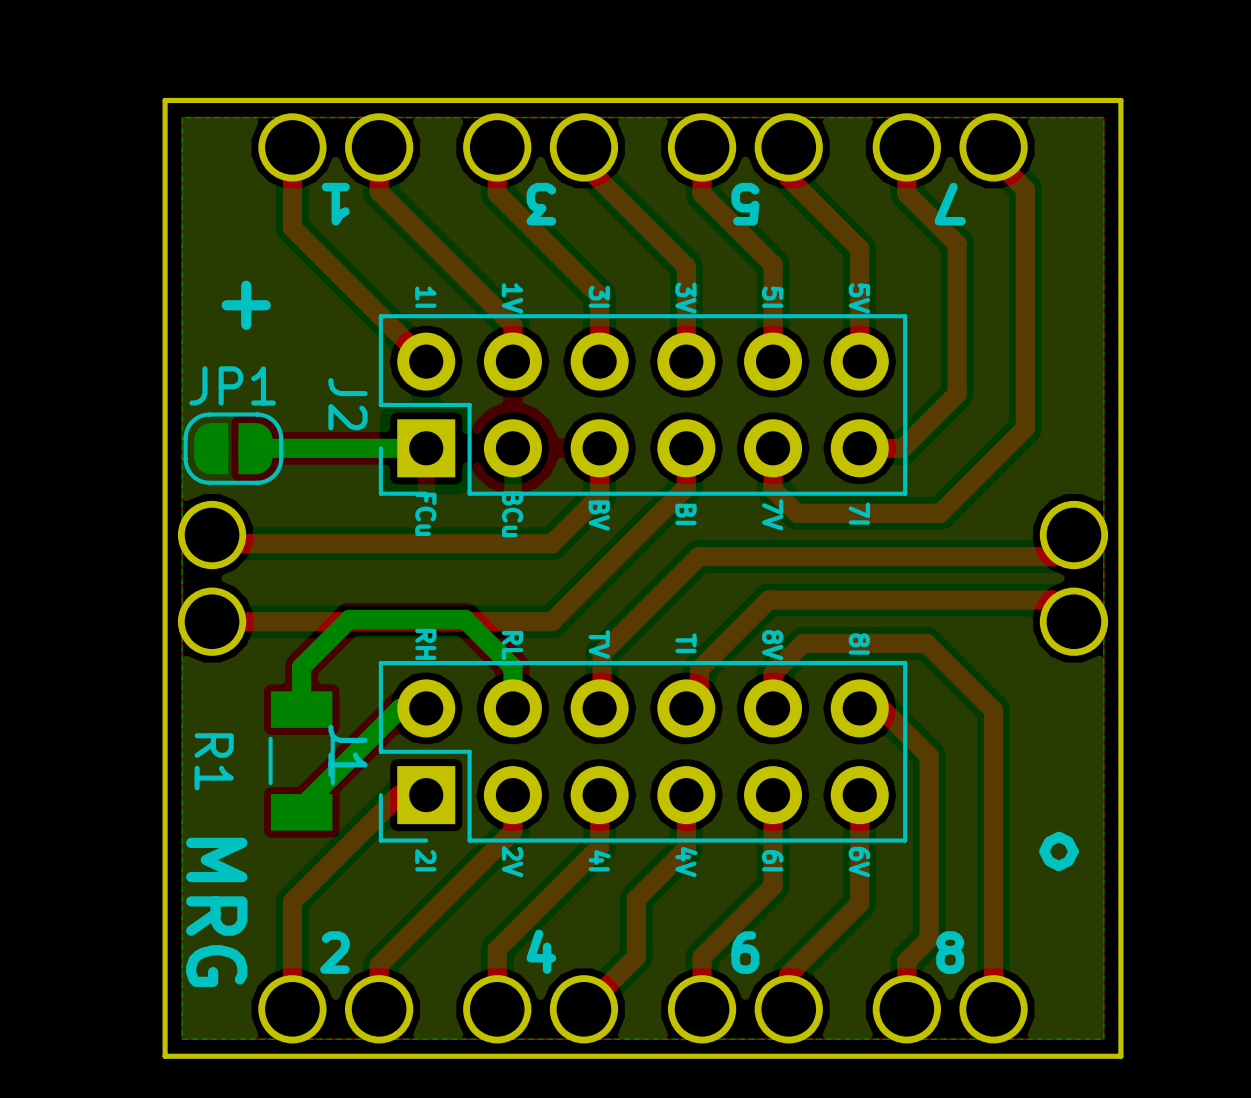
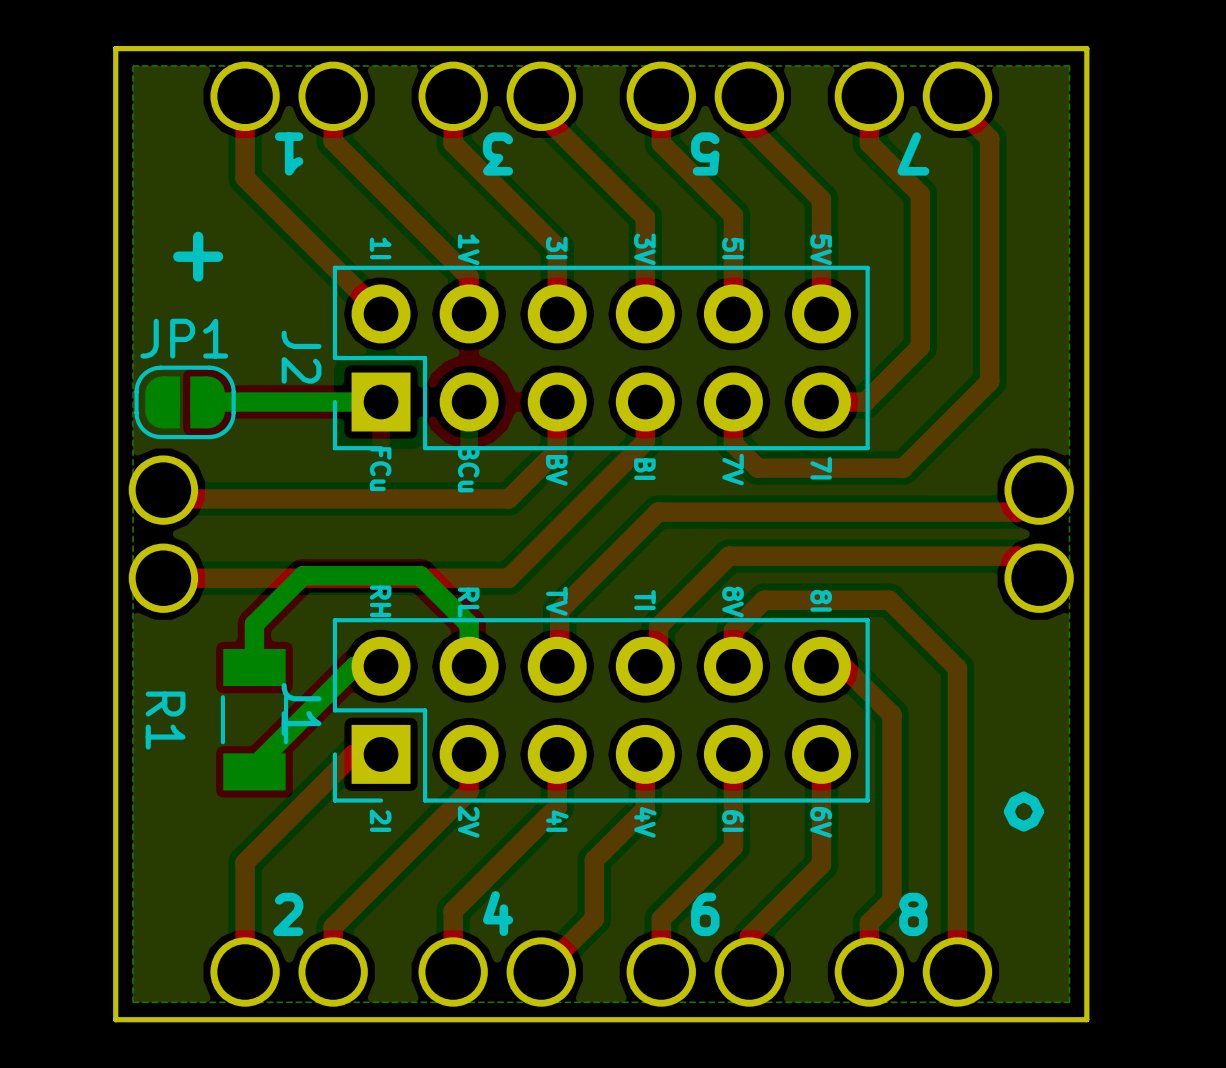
text: MRG (216, 912) -> none

